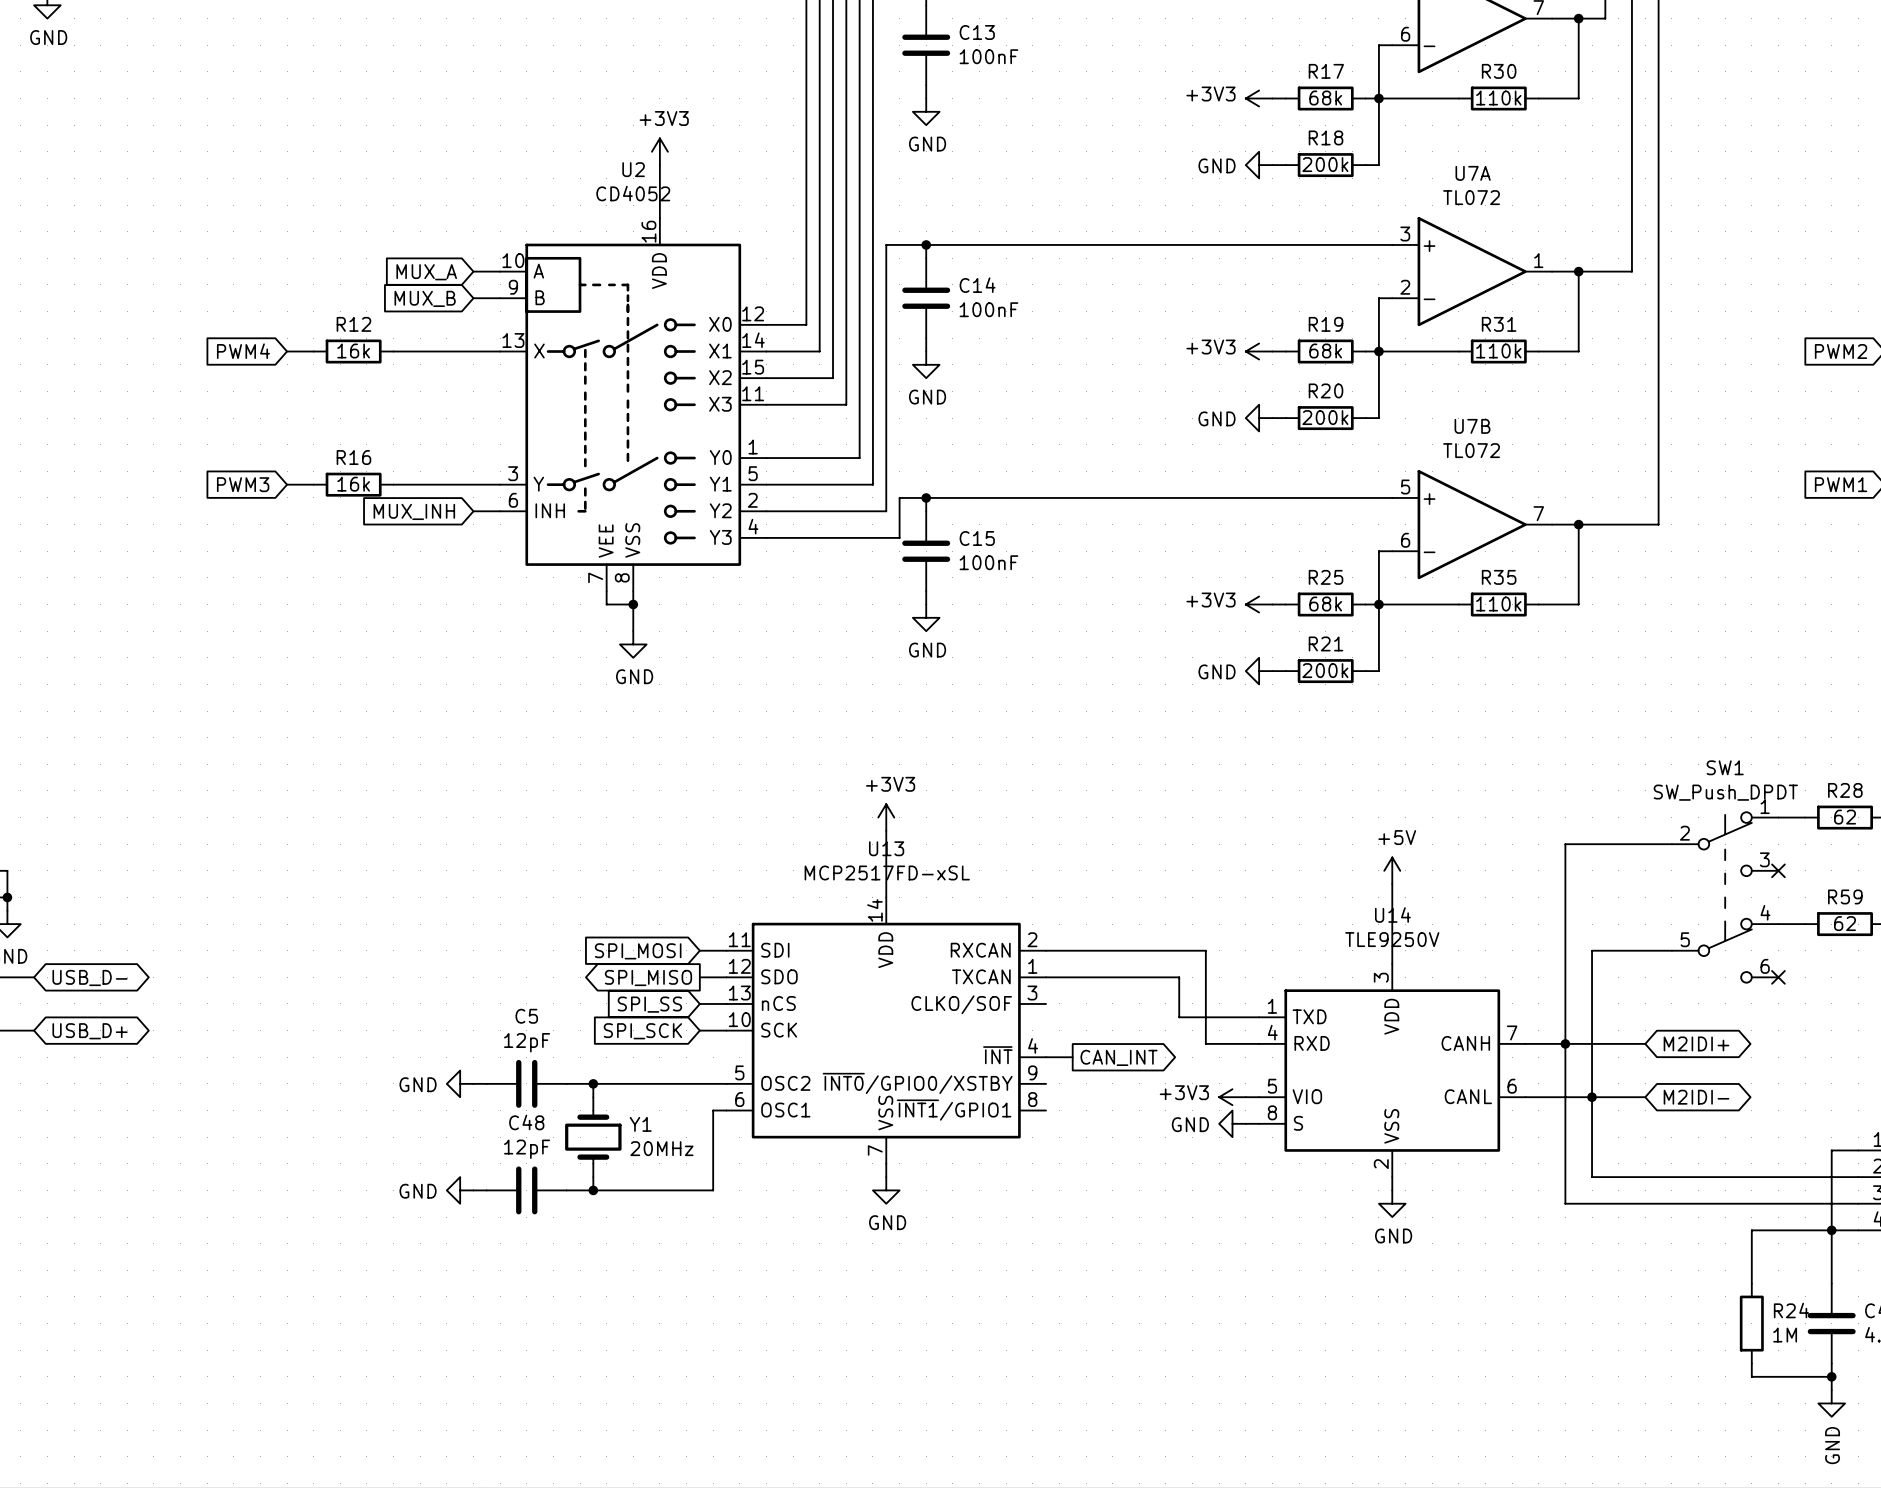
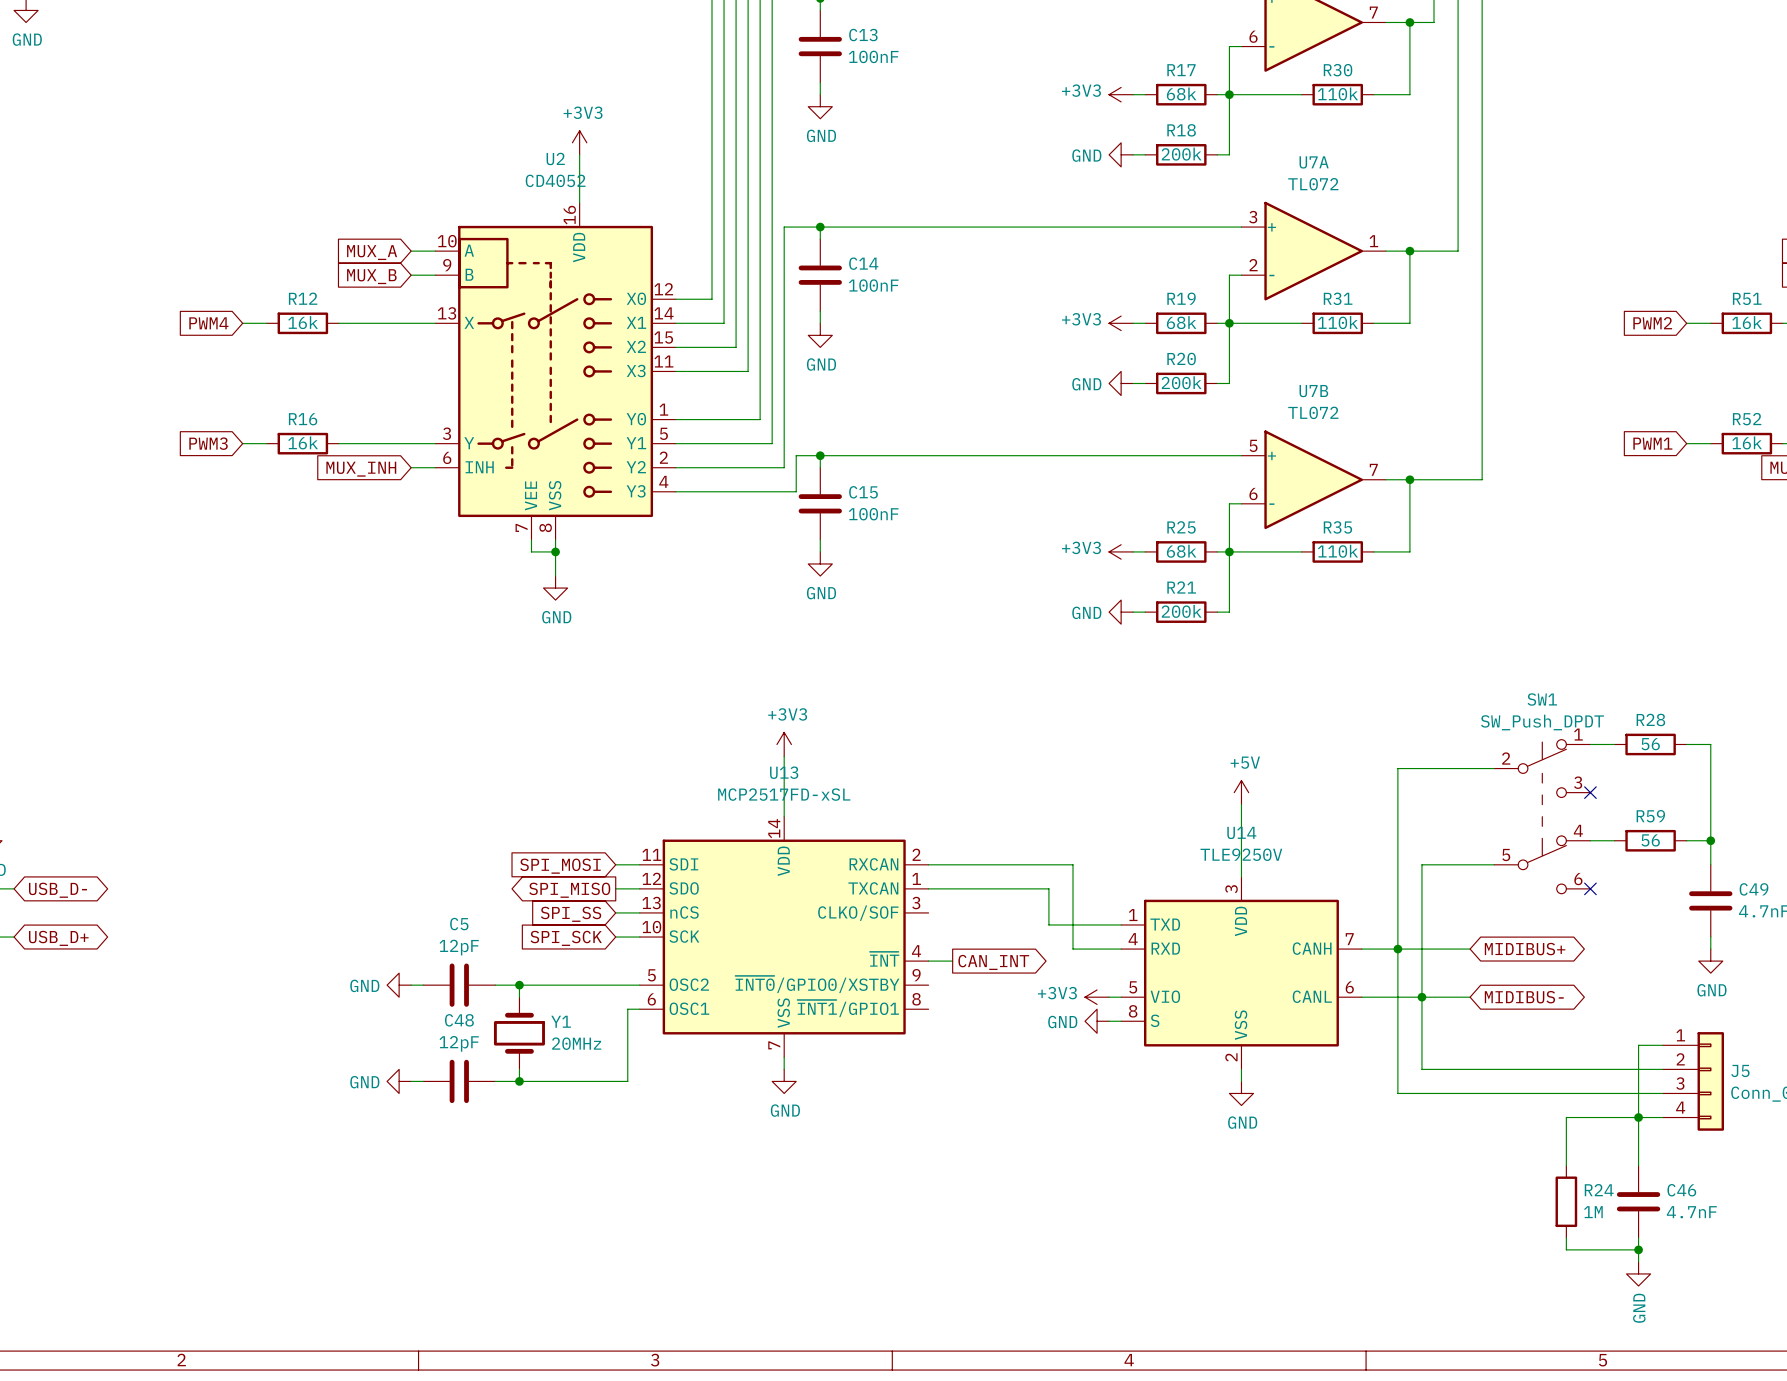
R28 value: 62 (1845, 817) -> 56 (1650, 744)
R59 value: 62 (1845, 923) -> 56 (1650, 840)
global label: M2IDI+ (1696, 1043) -> MIDIBUS+ (1525, 949)
global label: M2IDI- (1696, 1097) -> MIDIBUS- (1524, 997)

